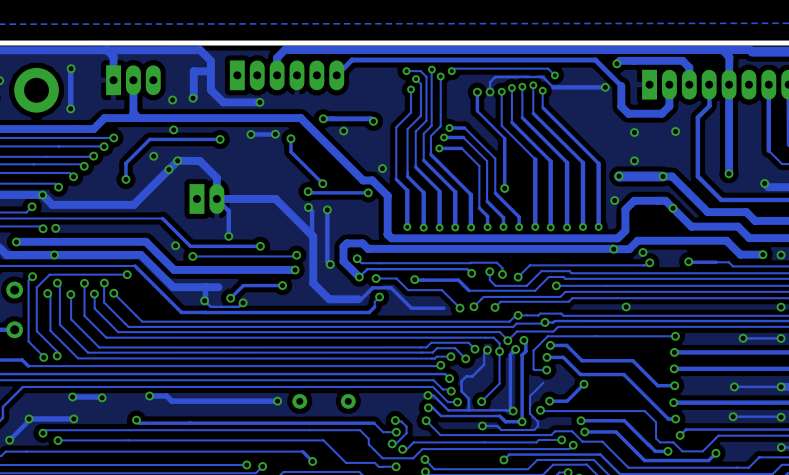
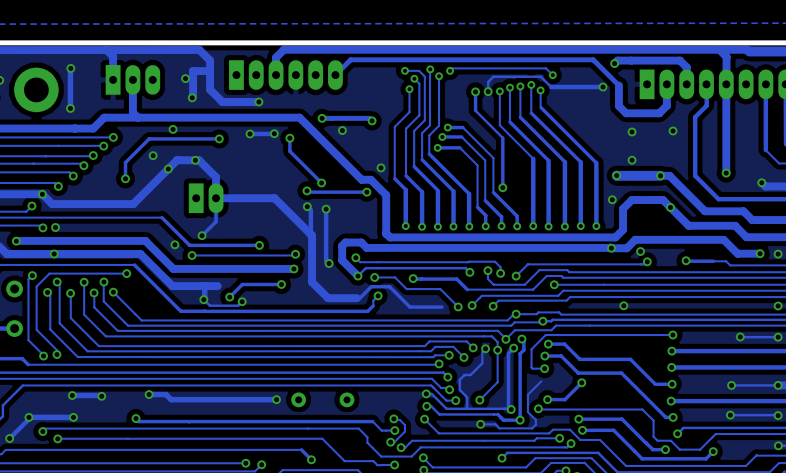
via position: (172, 99) -> (185, 78)
via position: (177, 160) -> (195, 160)
track: (216, 198) (228, 210) (228, 236) -> (216, 198) (216, 221) (202, 235)
via position: (228, 236) -> (202, 235)

